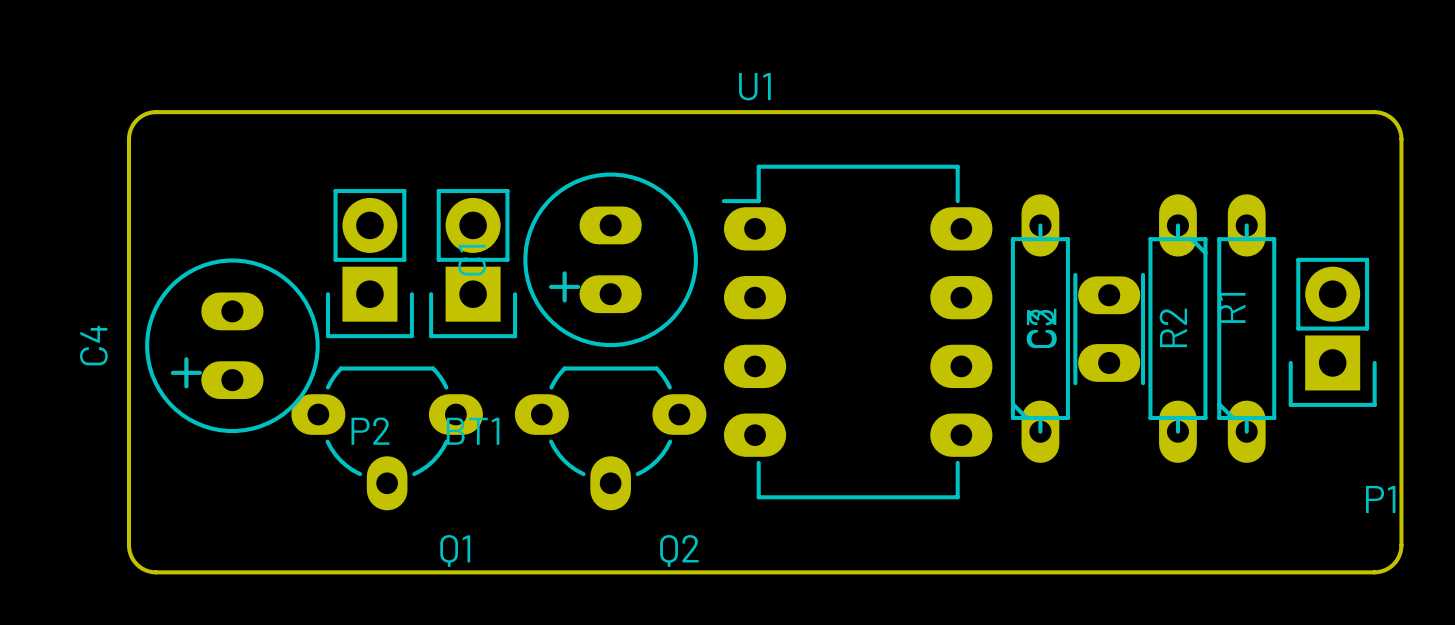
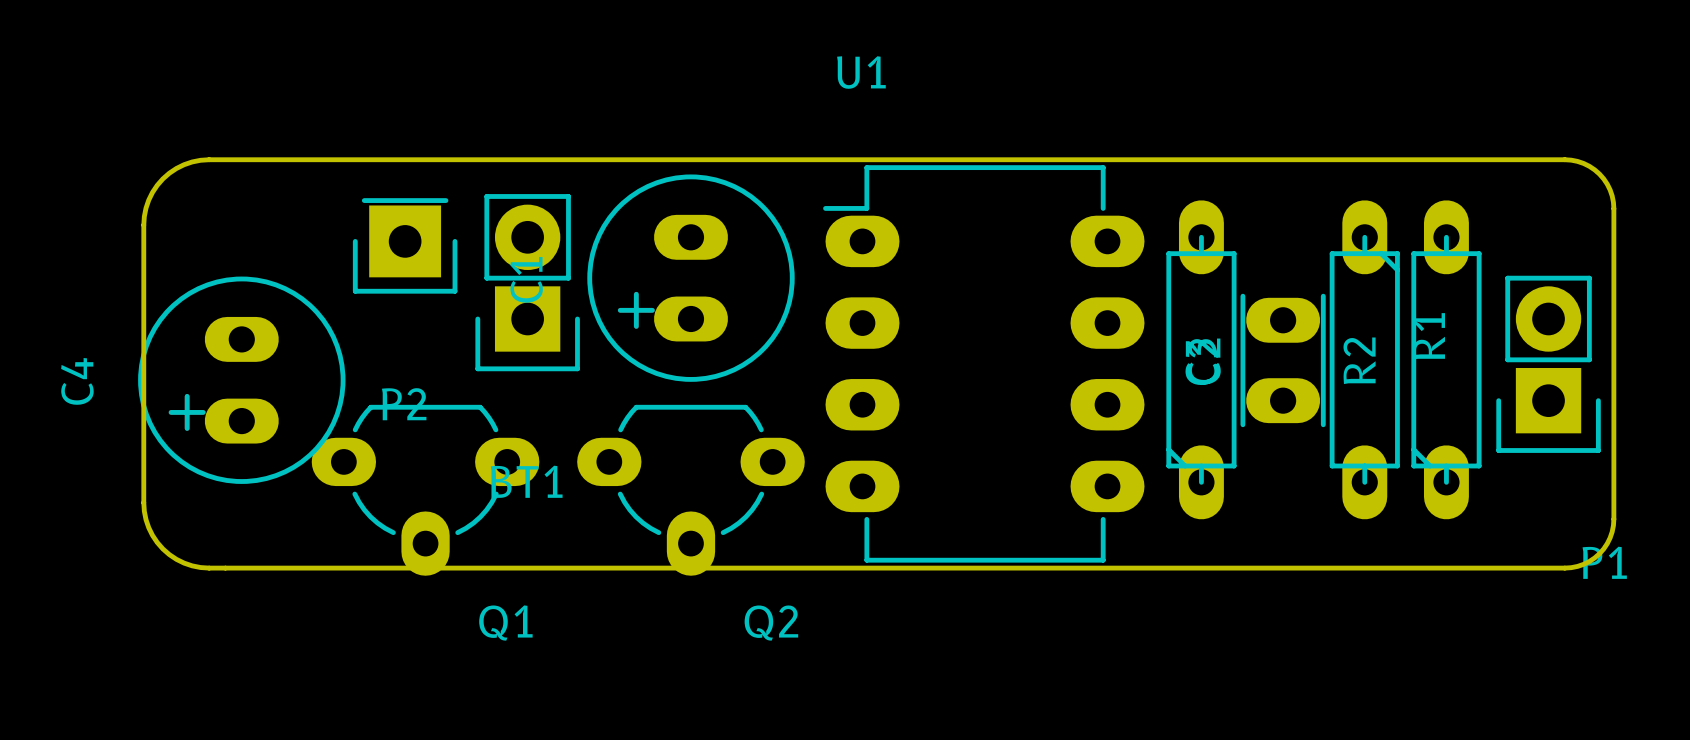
board edge: (156, 112) (1374, 112) (1384, 114) (1395, 122) (1401, 139) (1401, 545) (1399, 555) (1390, 566) (1374, 572) (156, 572) (145, 570) (134, 561) (128, 545) (128, 139) (131, 128) (136, 120) (145, 114) (156, 112) -> (209, 159) (184, 164) (162, 178) (148, 200) (143, 225) (144, 511) (148, 527) (157, 542) (176, 559) (192, 565) (209, 568) (1564, 568) (1577, 566) (1594, 557) (1603, 548) (1612, 531) (1613, 519) (1613, 202) (1610, 189) (1603, 178) (1594, 169) (1577, 161) (1564, 159) (209, 159)
P2 footprint: [325, 189, 414, 339] -> [352, 198, 458, 294]

